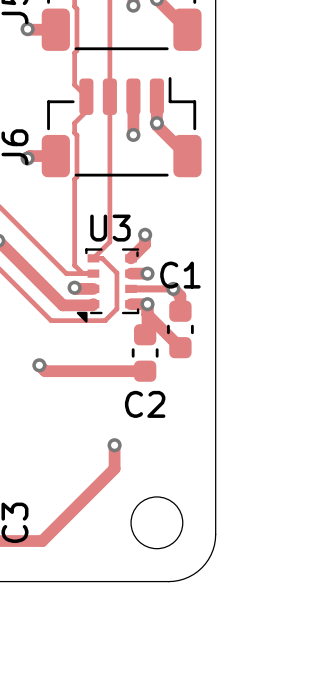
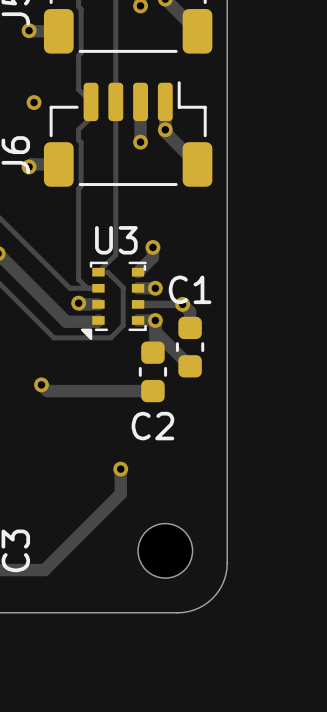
via: none -> (34, 102)

